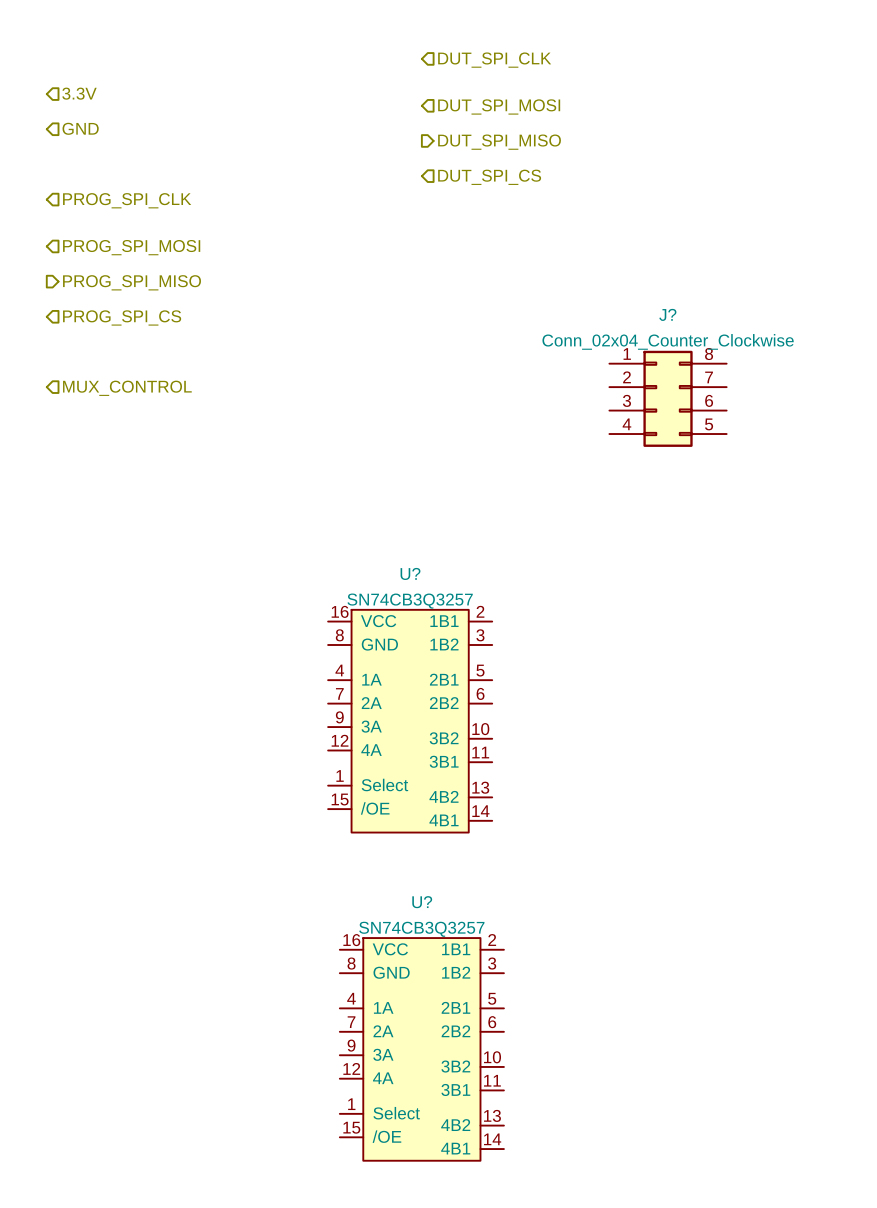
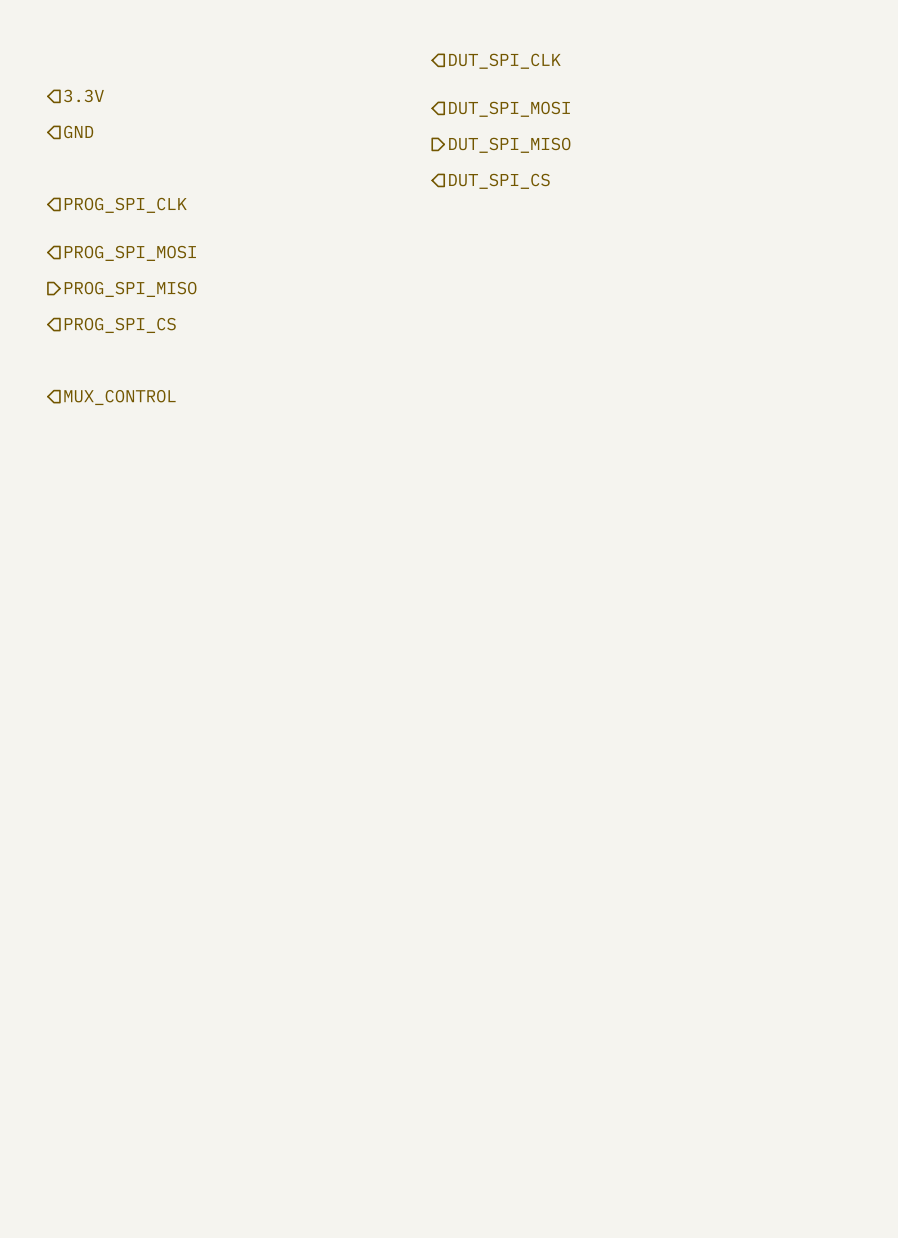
J?: Conn_02x04_Counter_Clockwise (668, 398) -> none
U?: SN74CB3Q3257 (410, 721) -> none
U?: SN74CB3Q3257 (421, 1049) -> none

